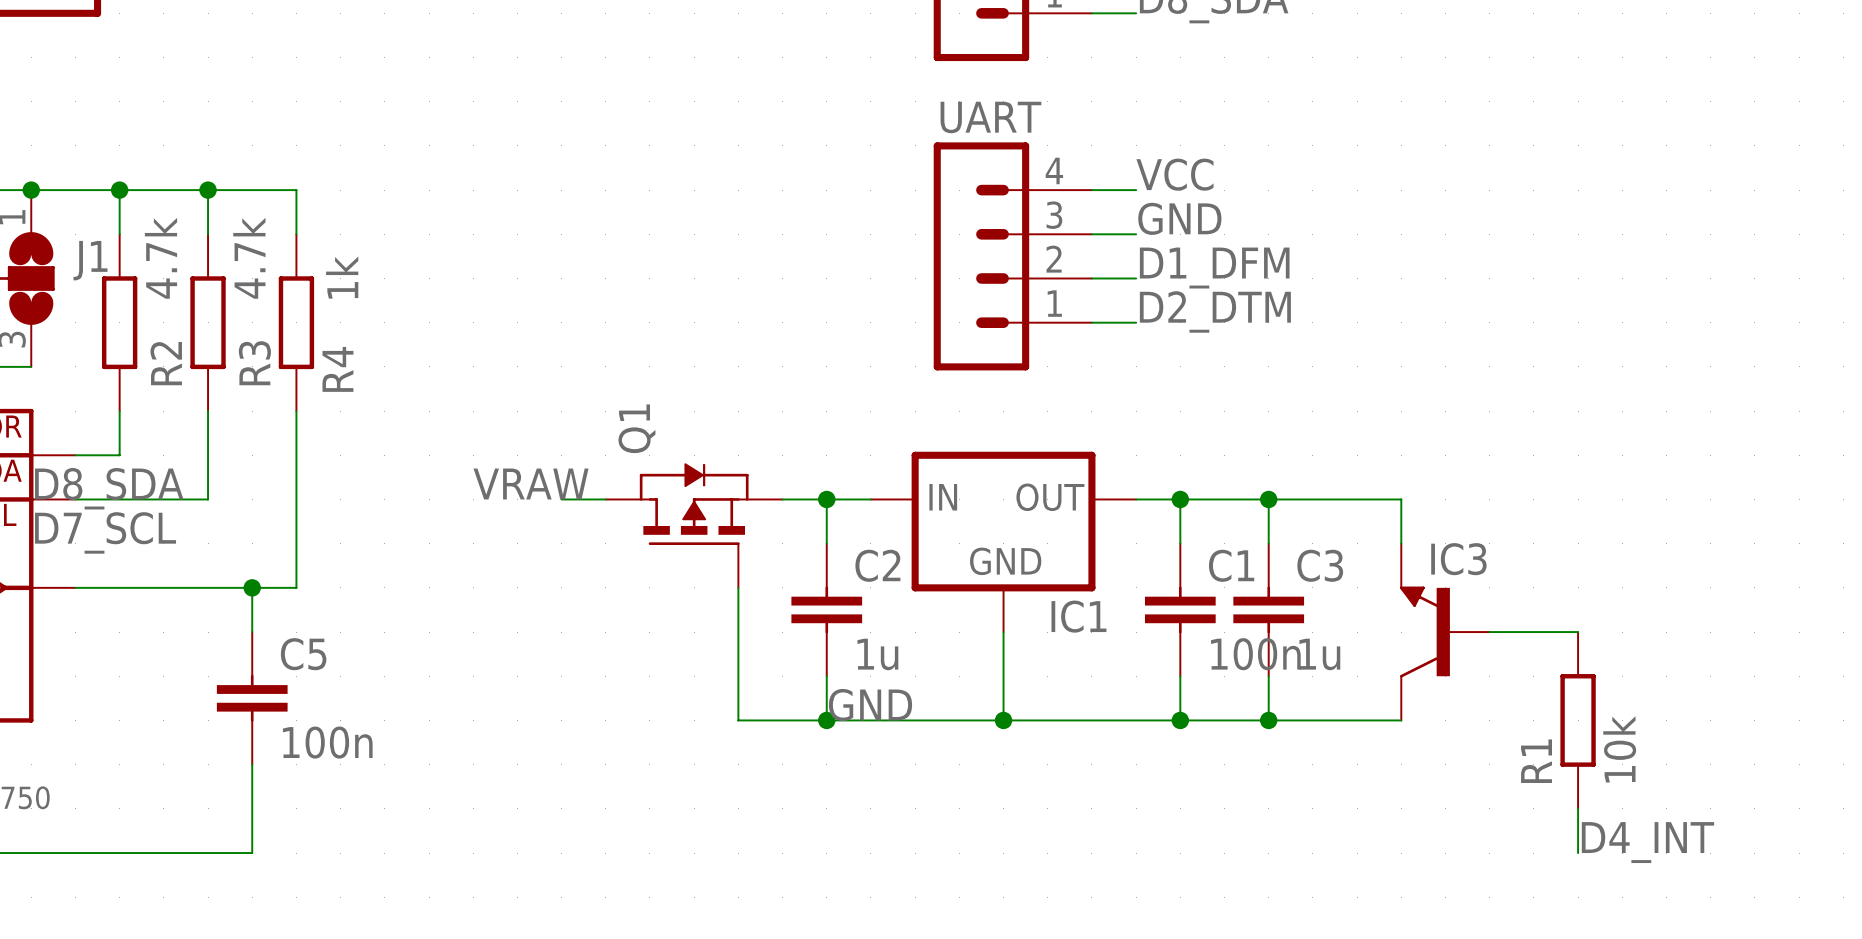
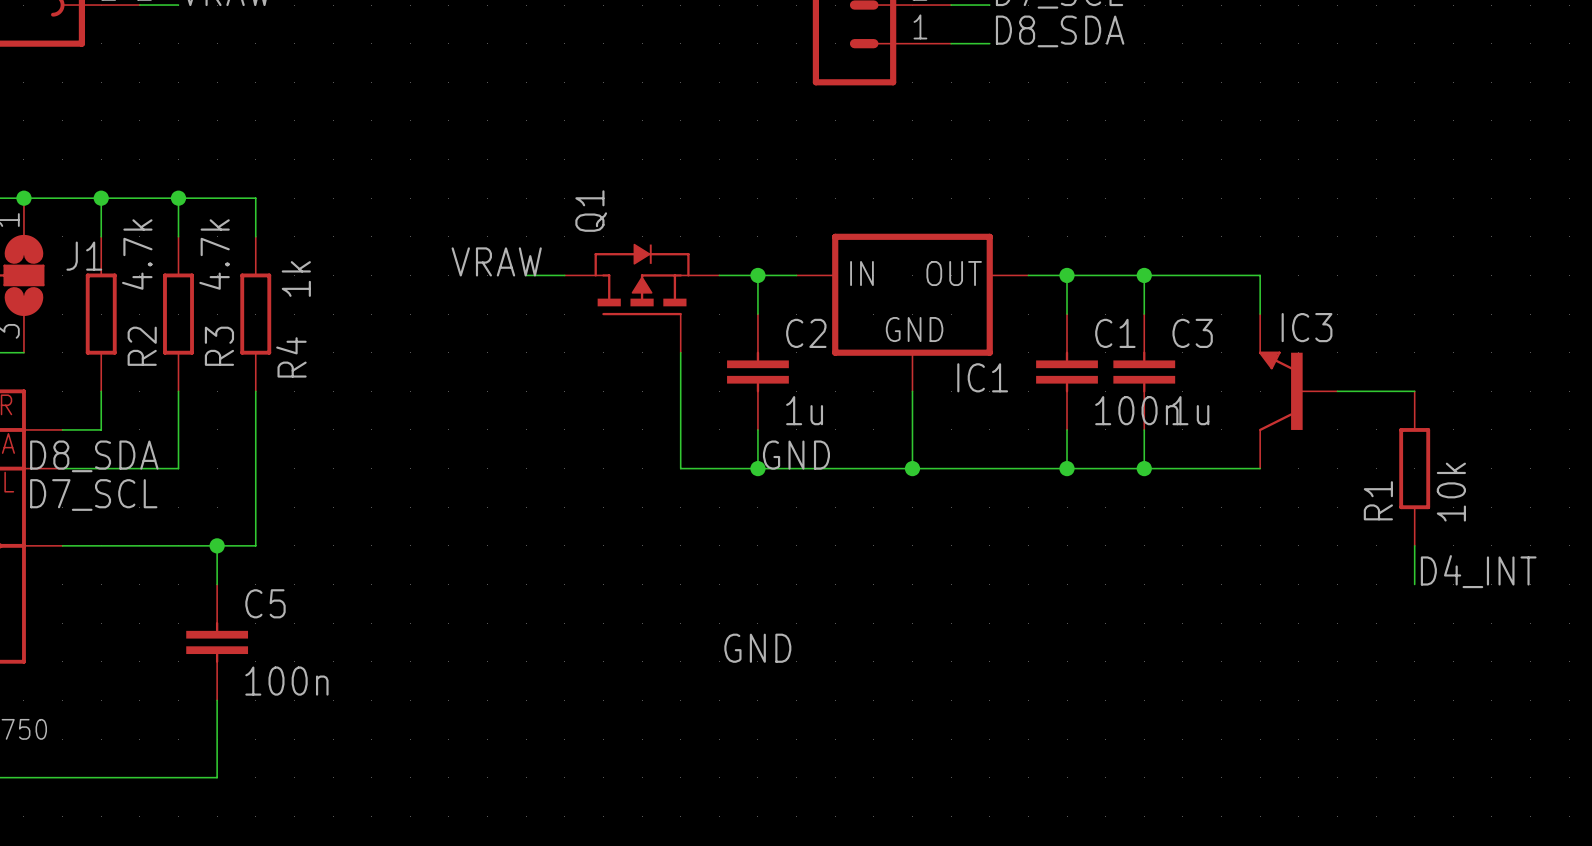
label: VCC (1174, 174) -> none
wire: (1091, 190) (1136, 190) -> none
label: GND (1179, 218) -> none
UART: (1012, 256) -> none
label: D1_DFM (1214, 268) -> none
wire: none -> (719, 275) (796, 275)
junction: none -> (757, 275)
wire: (1091, 278) (1136, 278) -> none
wire: none -> (1028, 275) (1260, 275) (1260, 314)
junction: none -> (1067, 275)
junction: none -> (1144, 275)
label: D2_DTM (1215, 311) -> none
wire: (1091, 322) (1136, 322) -> none
wire: none -> (680, 352) (680, 468)
wire: none -> (757, 429) (757, 468) (989, 468)
label position: VRAW (531, 484) -> VRAW (496, 261)
label: none -> GND (796, 455)
wire: (561, 499) (605, 499) -> (526, 275) (564, 275)
wire: (826, 499) (826, 543) -> (757, 275) (757, 314)
junction position: (826, 499) -> (757, 468)
junction: none -> (912, 468)
wire: (1180, 499) (1180, 543) -> (1067, 275) (1067, 314)
junction: (1180, 499) -> none
junction: none -> (1067, 468)
wire: (1268, 499) (1268, 543) -> (1144, 275) (1144, 314)
junction: (1268, 499) -> none
junction: none -> (1144, 468)
wire: (1401, 499) (1401, 543) -> (1221, 468) (1260, 468)
Q1 position: (694, 525) -> (642, 298)
IC1 position: (1003, 541) -> (912, 312)
wire: (738, 587) (738, 720) (1401, 720) -> none
C2 position: (826, 609) -> (757, 372)
C1 position: (1180, 609) -> (1067, 372)
C3 position: (1268, 609) -> (1144, 372)
wire: (1003, 632) (1003, 720) -> (912, 391) (912, 468)
IC3 position: (1444, 632) -> (1298, 391)
wire: (1489, 632) (1578, 632) -> (1337, 391) (1414, 391)
wire: (826, 676) (826, 720) -> none
wire: (1180, 676) (1180, 720) -> (1067, 429) (1067, 468)
wire: (1268, 676) (1268, 720) -> (1144, 429) (1144, 468)
junction: (826, 720) -> none
junction: (1003, 720) -> none
junction: (1180, 720) -> none
junction: (1268, 720) -> none
R1 position: (1578, 720) -> (1414, 468)
wire: (1578, 808) (1578, 853) -> (1414, 545) (1414, 584)
label position: D4_INT (1647, 842) -> D4_INT (1478, 571)

